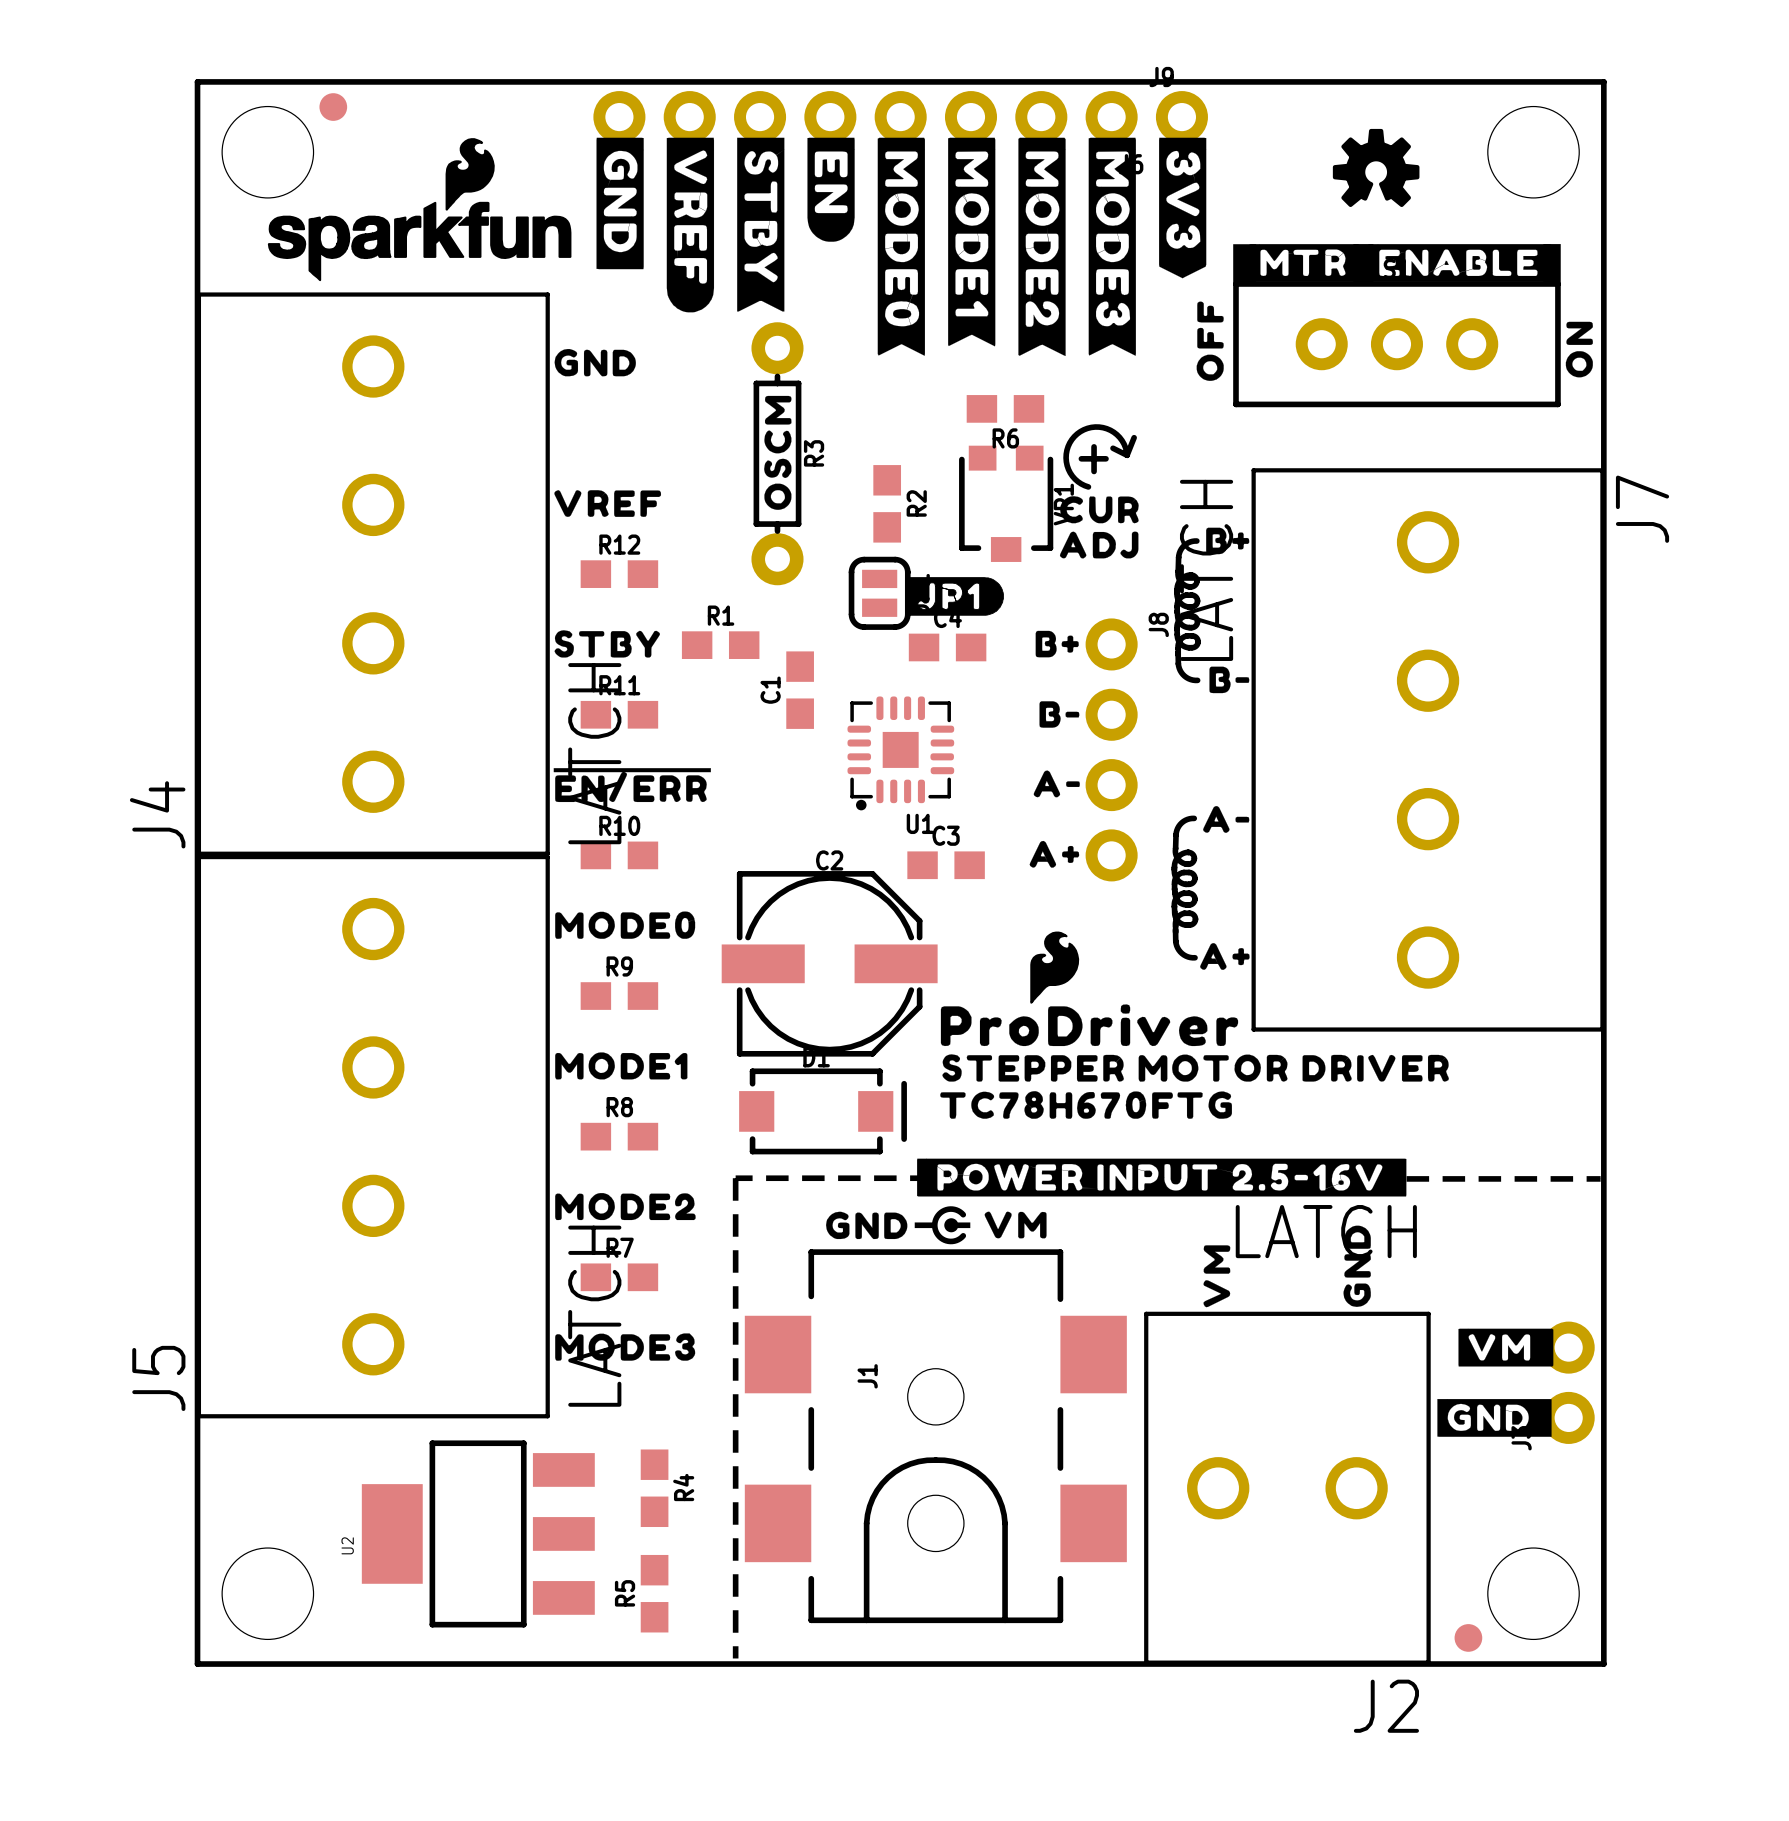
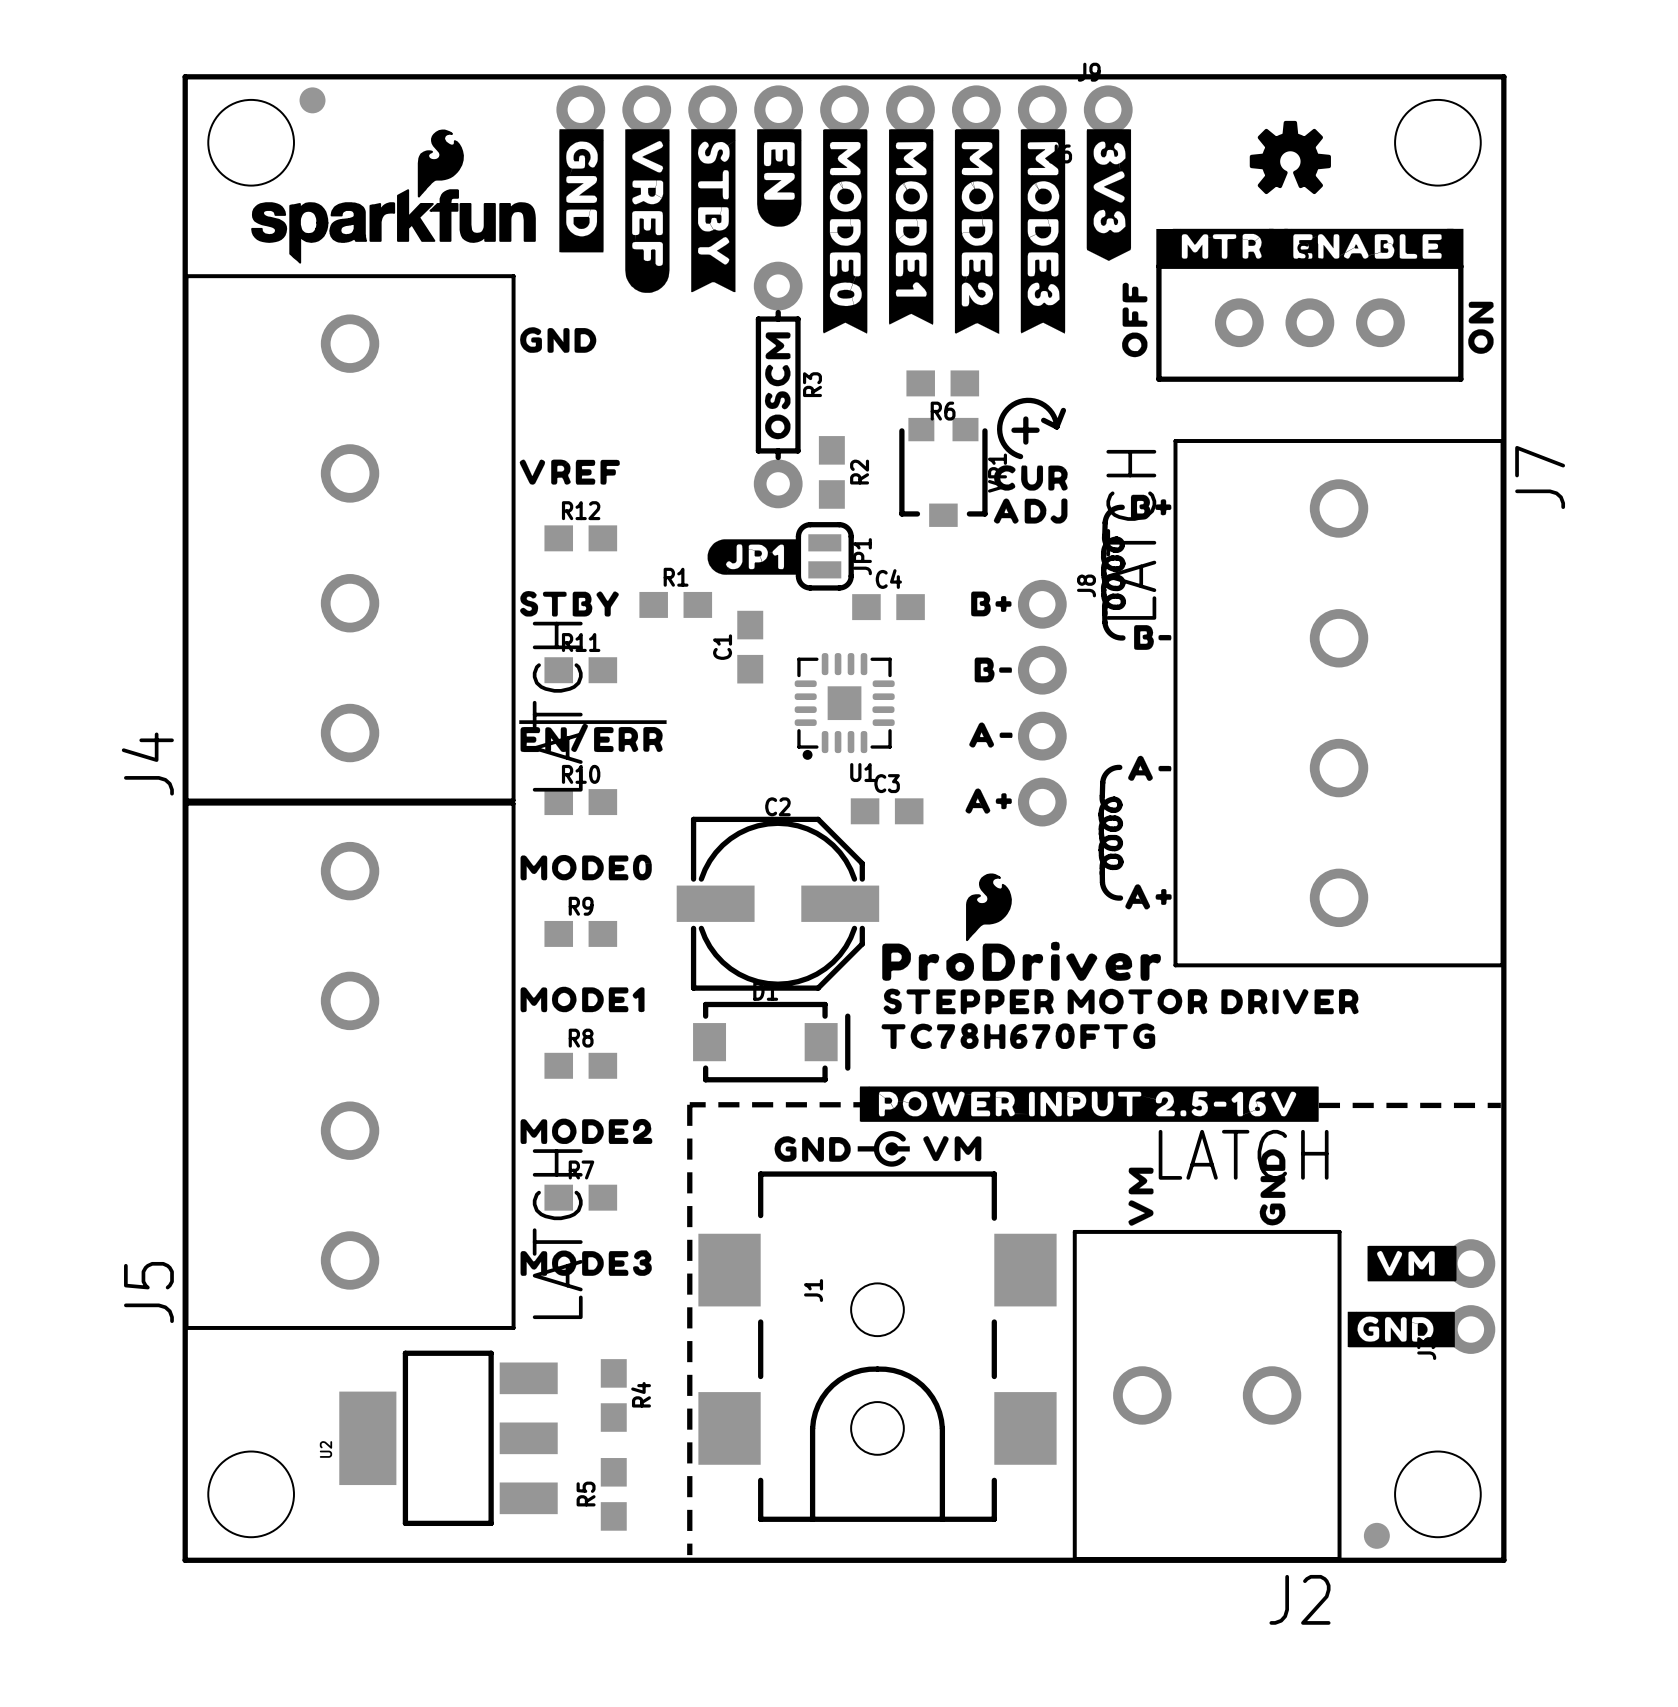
drawing position: (777, 452) -> (777, 385)
R3 position: (777, 453) -> (778, 384)
drawing: none -> [707, 539, 798, 575]
drawing: [907, 577, 1004, 616] -> none

